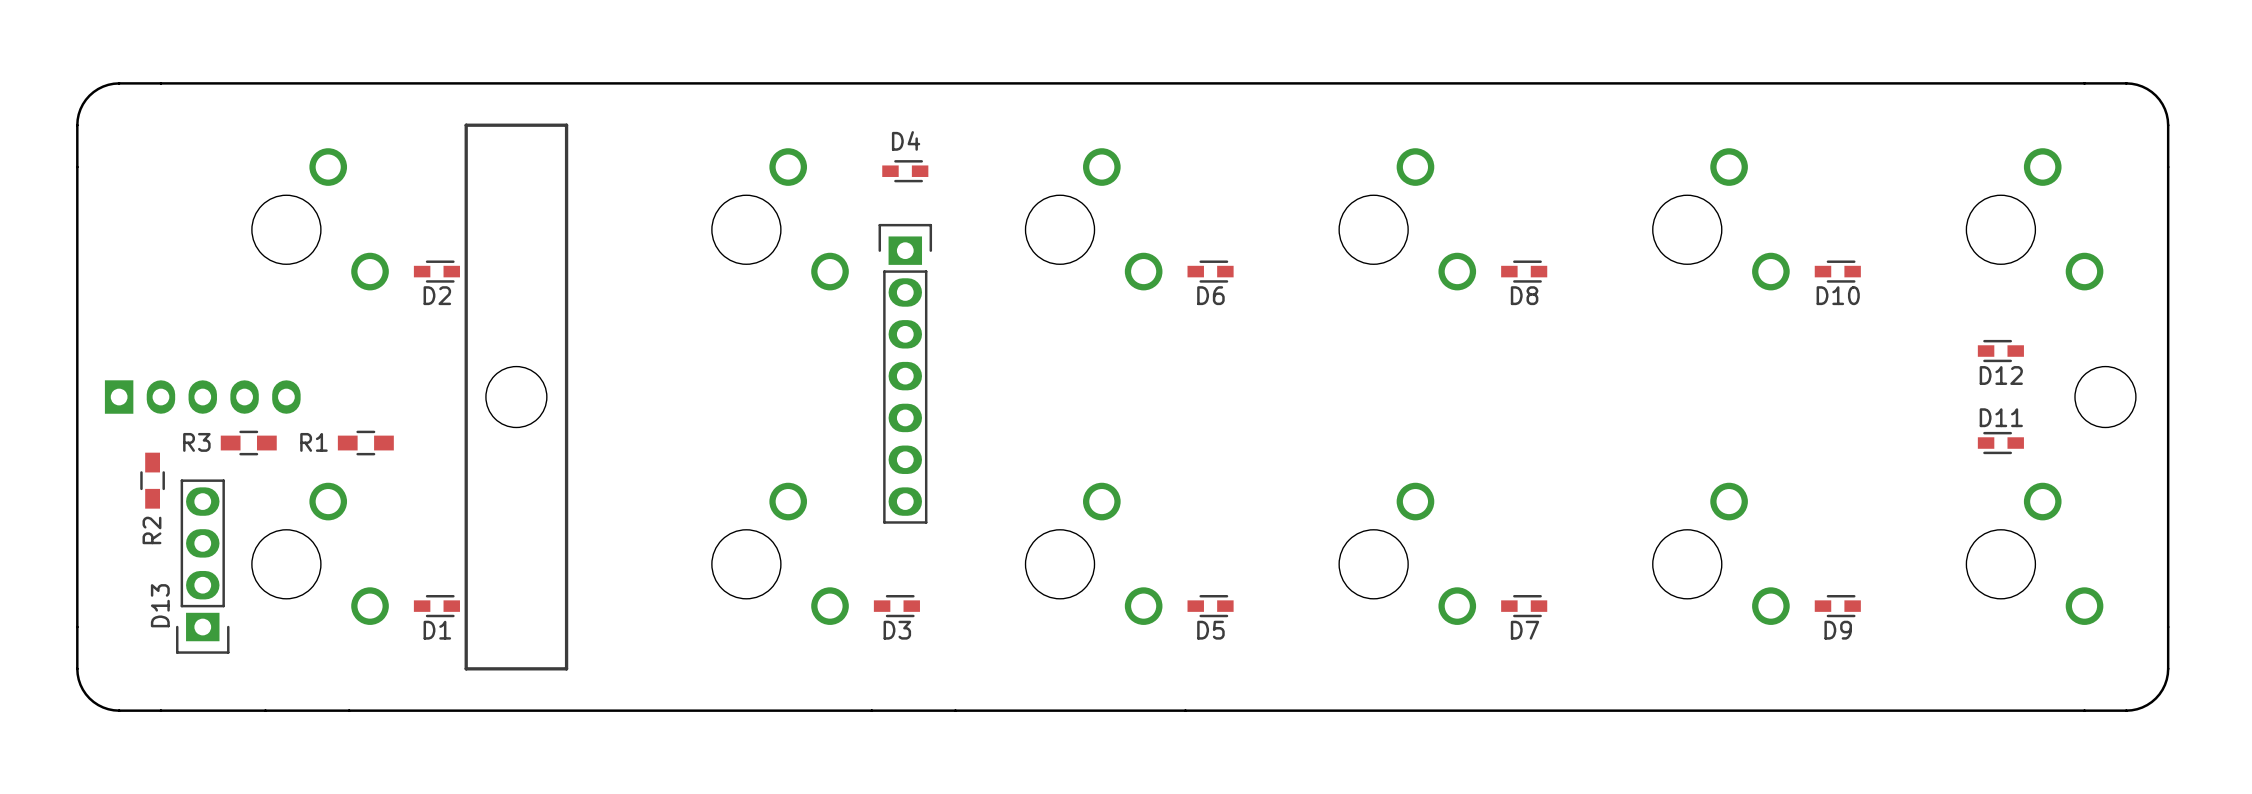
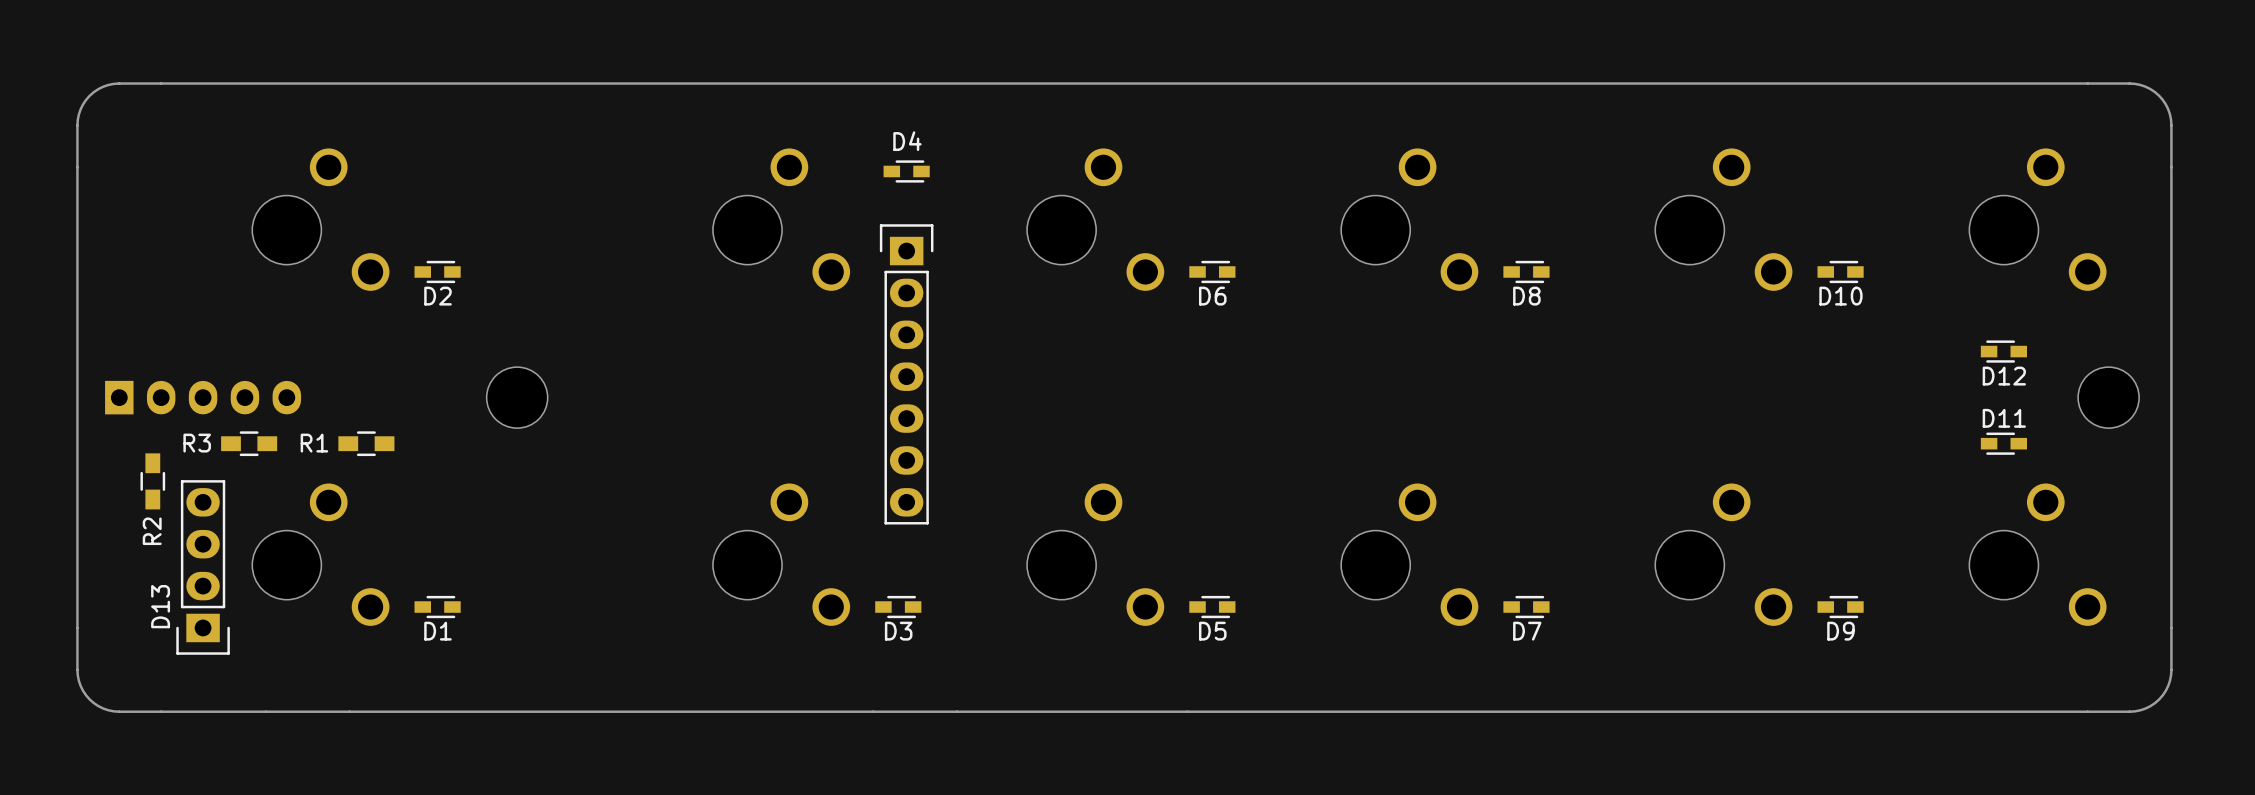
line: (466, 125) (566, 125) (566, 668) (466, 668) (466, 125) -> none

